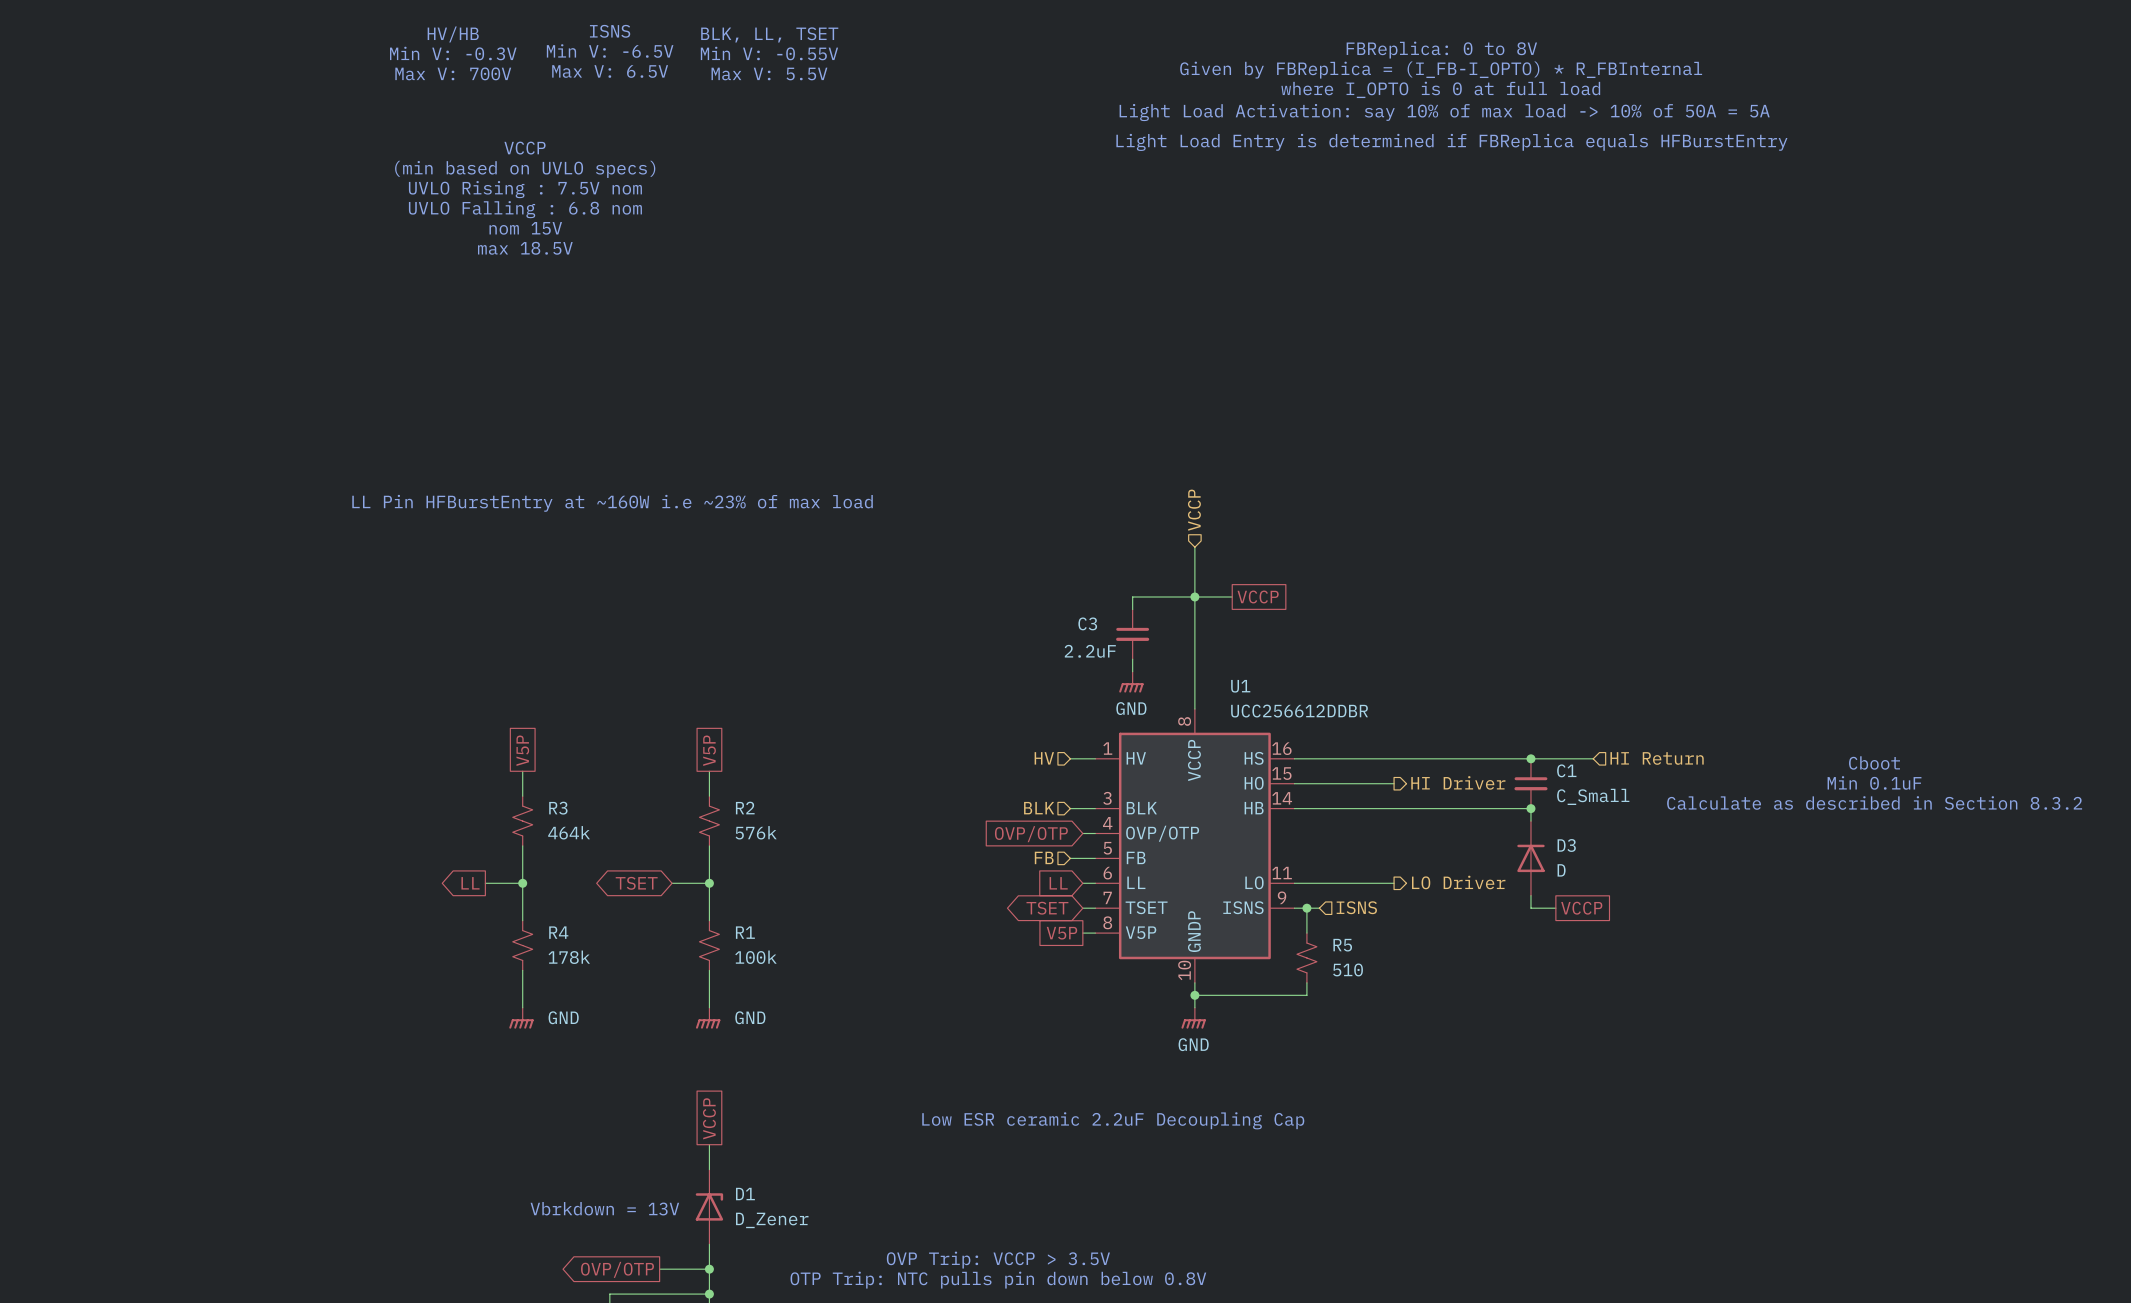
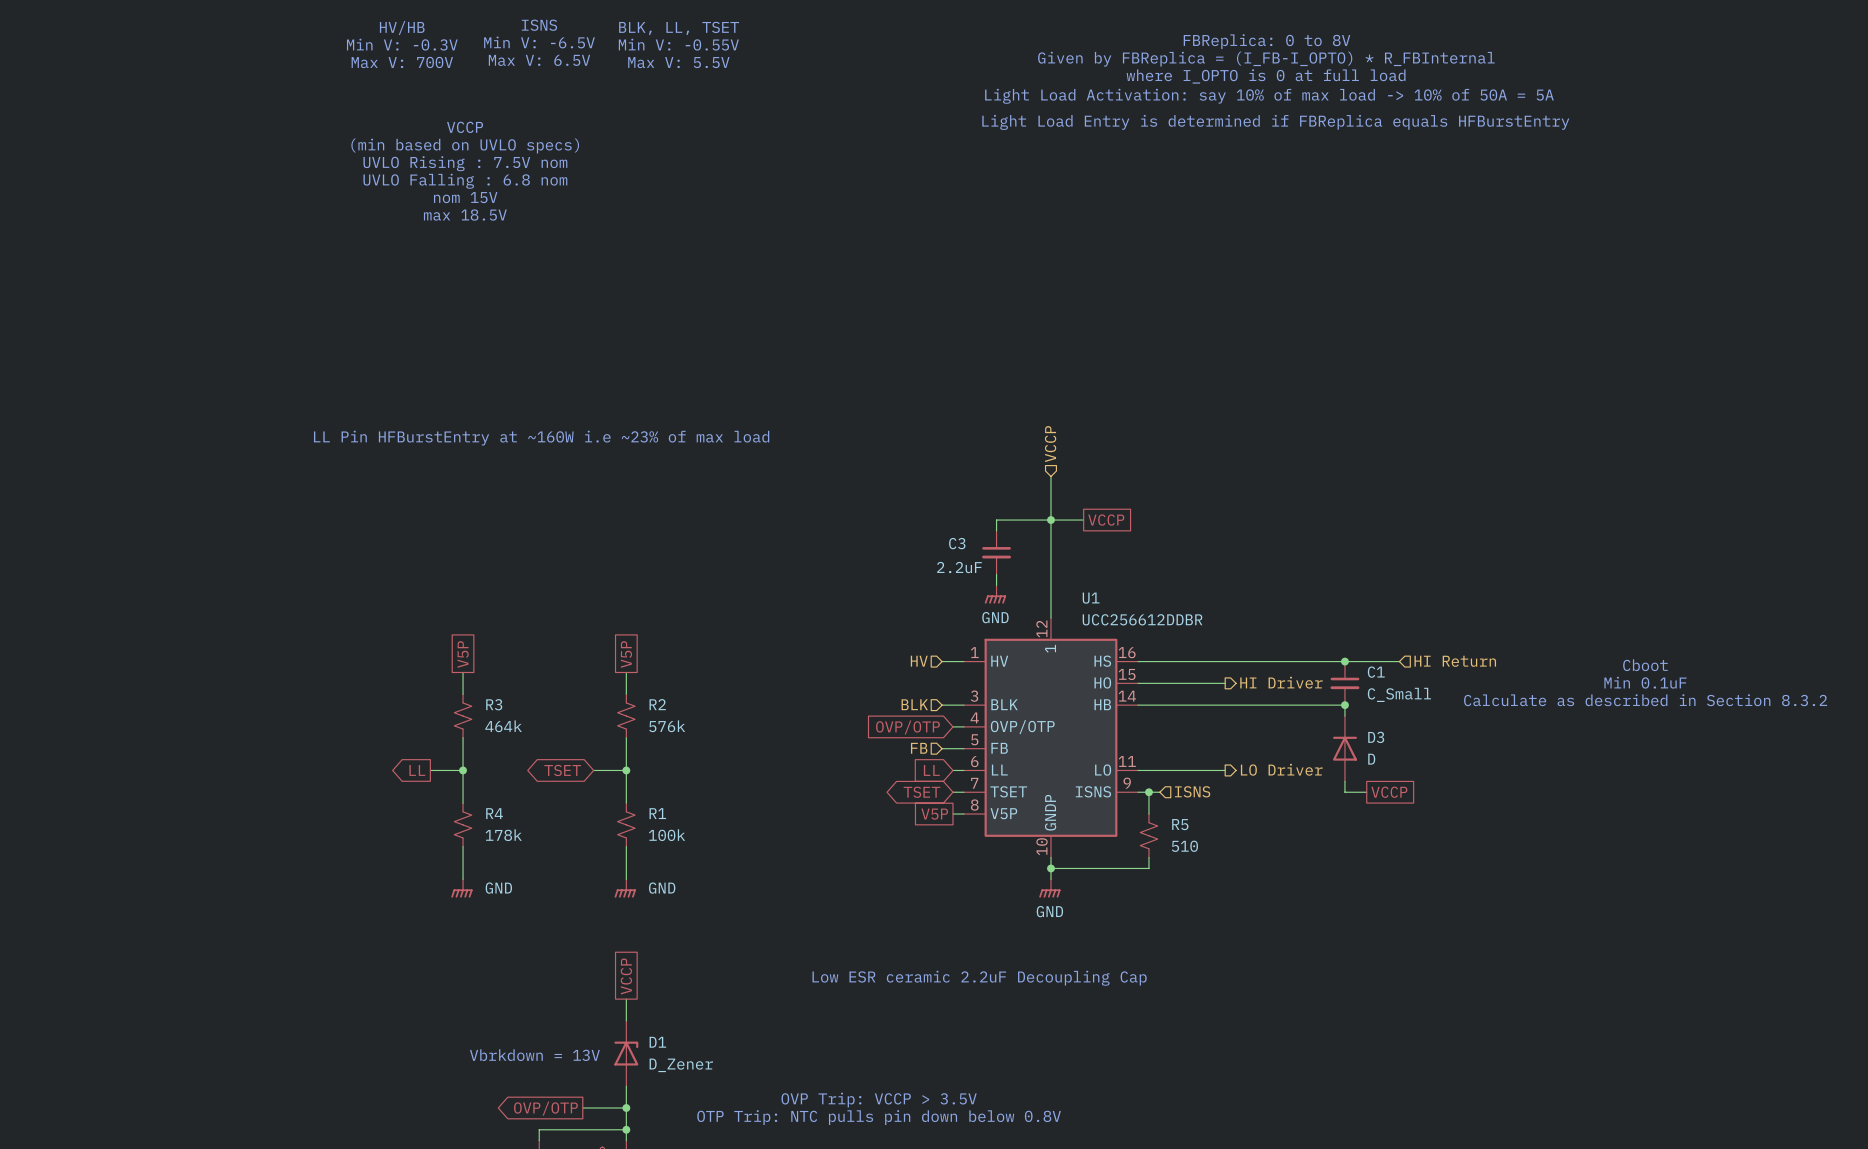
U1 pin number: 8 (1184, 721) -> 12 (1041, 629)
U1 pin name: VCCP (1194, 760) -> 1 (1050, 648)

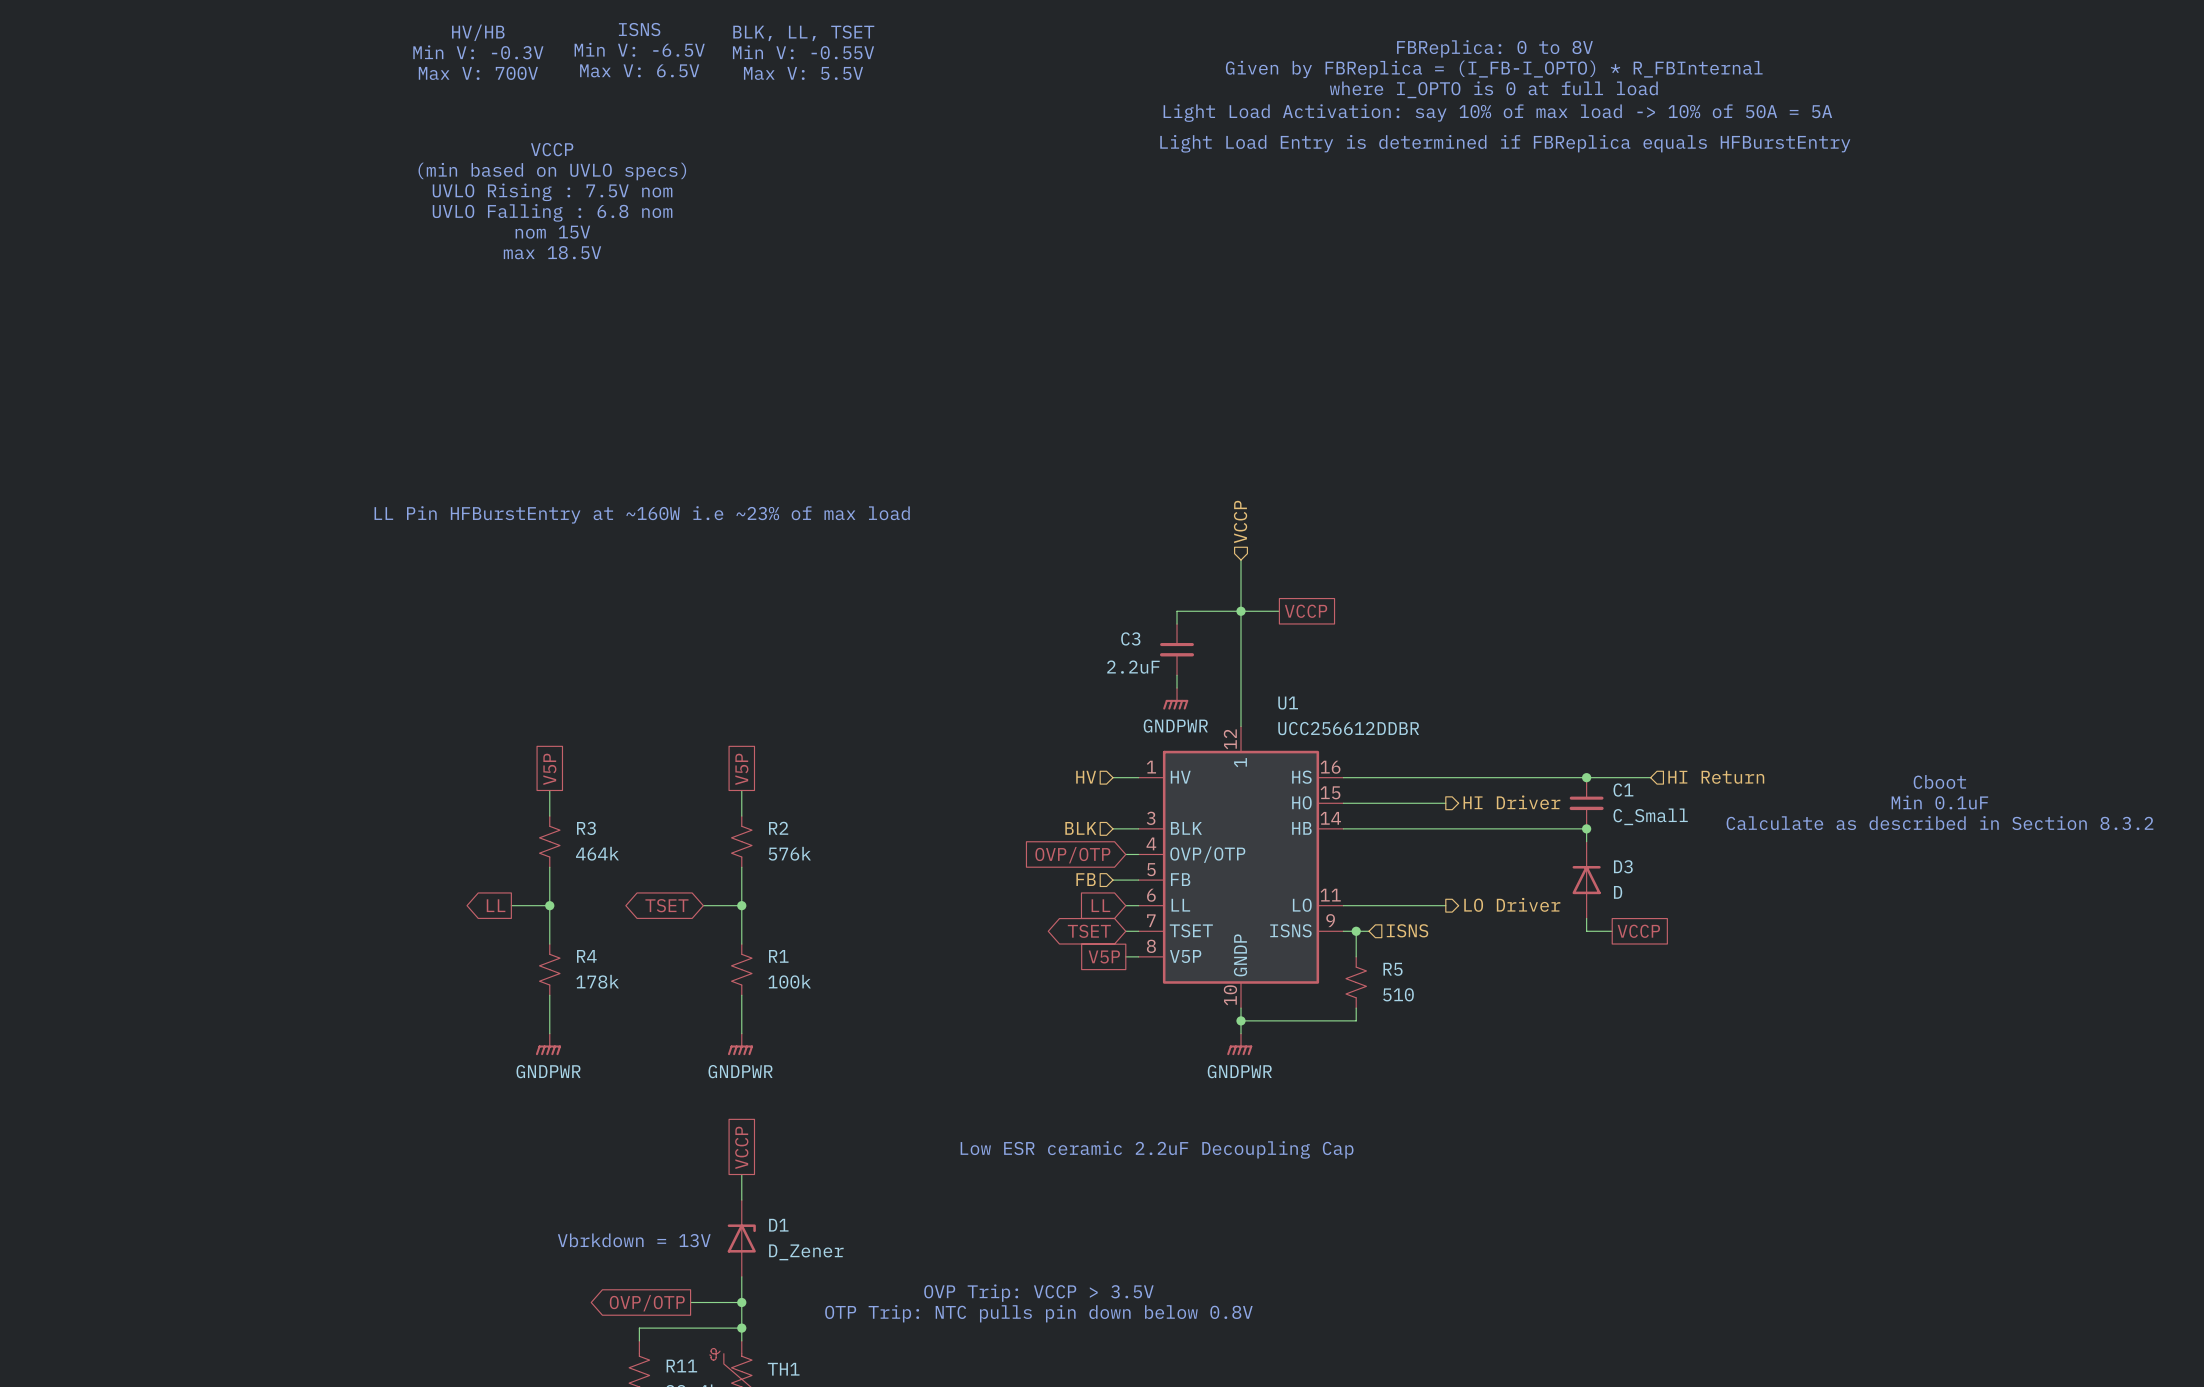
power symbol: GND (995, 594) -> GNDPWR (1175, 698)
power symbol: GND (461, 888) -> GNDPWR (548, 1044)
power symbol: GND (625, 888) -> GNDPWR (740, 1044)
power symbol: GND (1049, 888) -> GNDPWR (1239, 1044)

